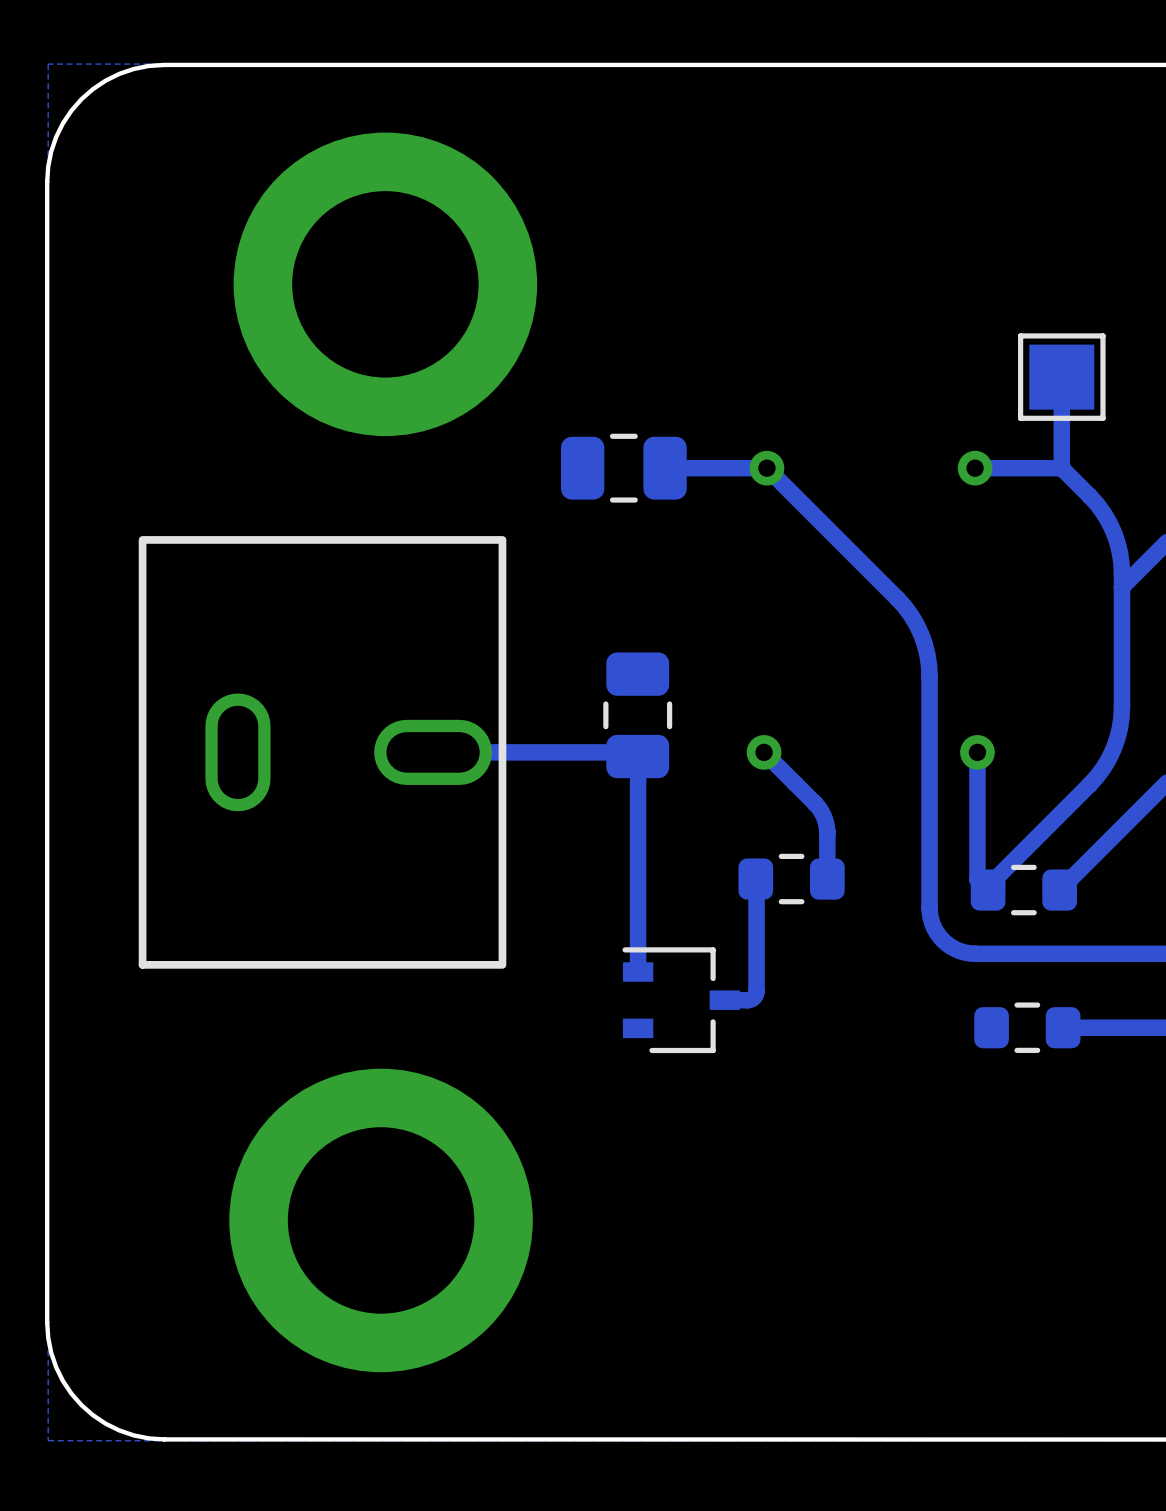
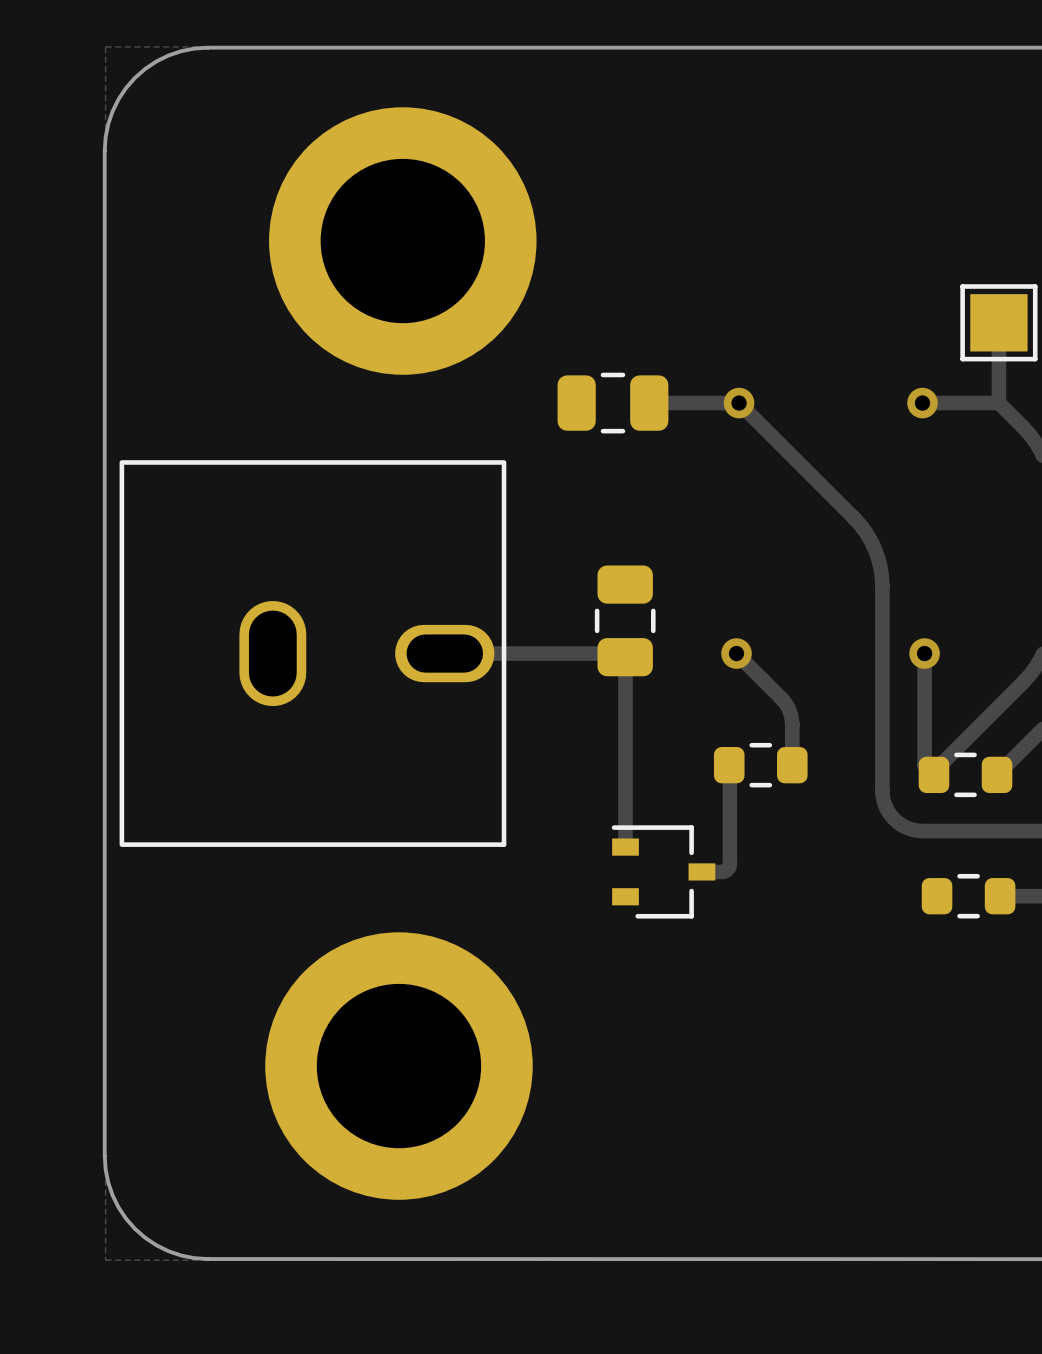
part footprint: [138, 536, 507, 969] -> [119, 460, 507, 847]

